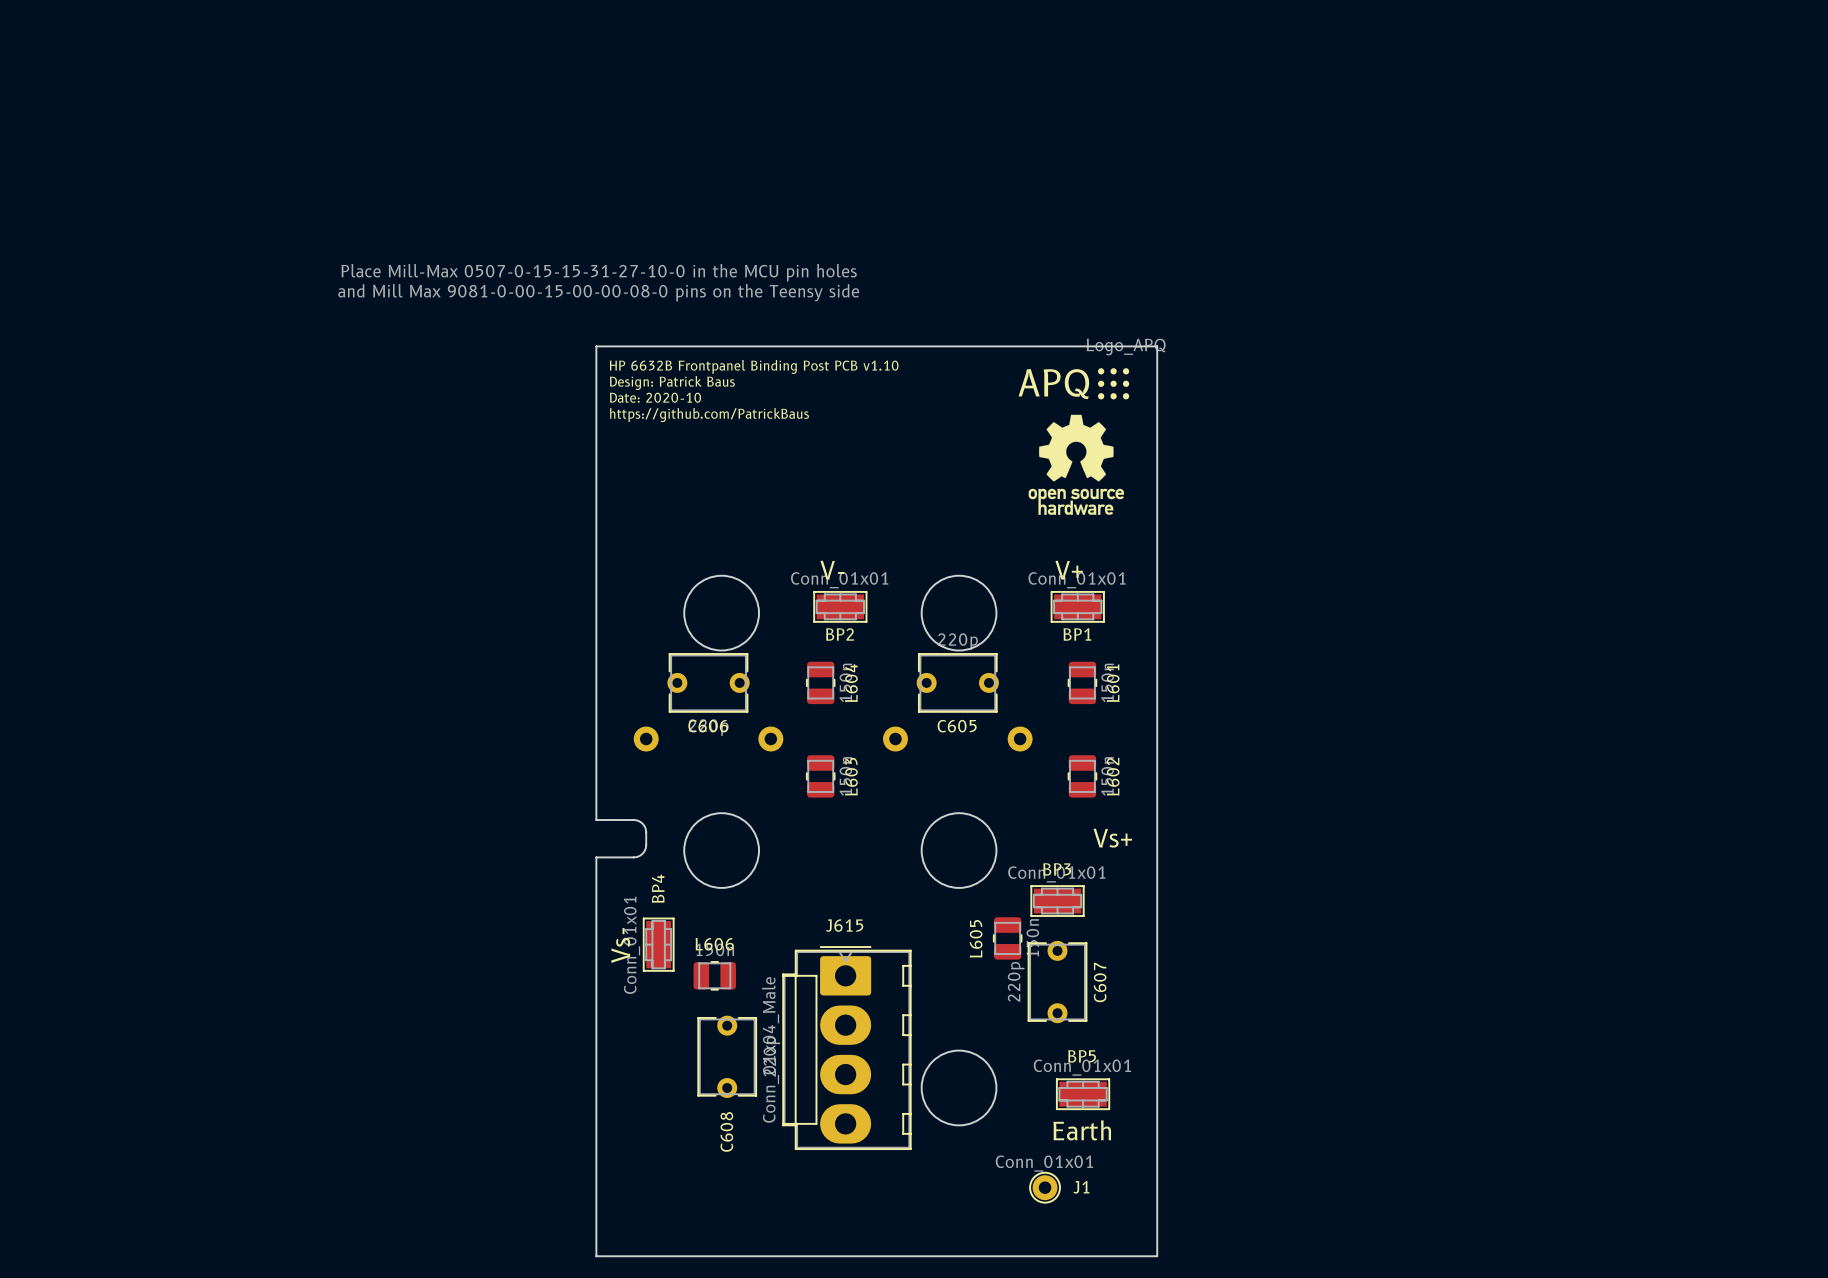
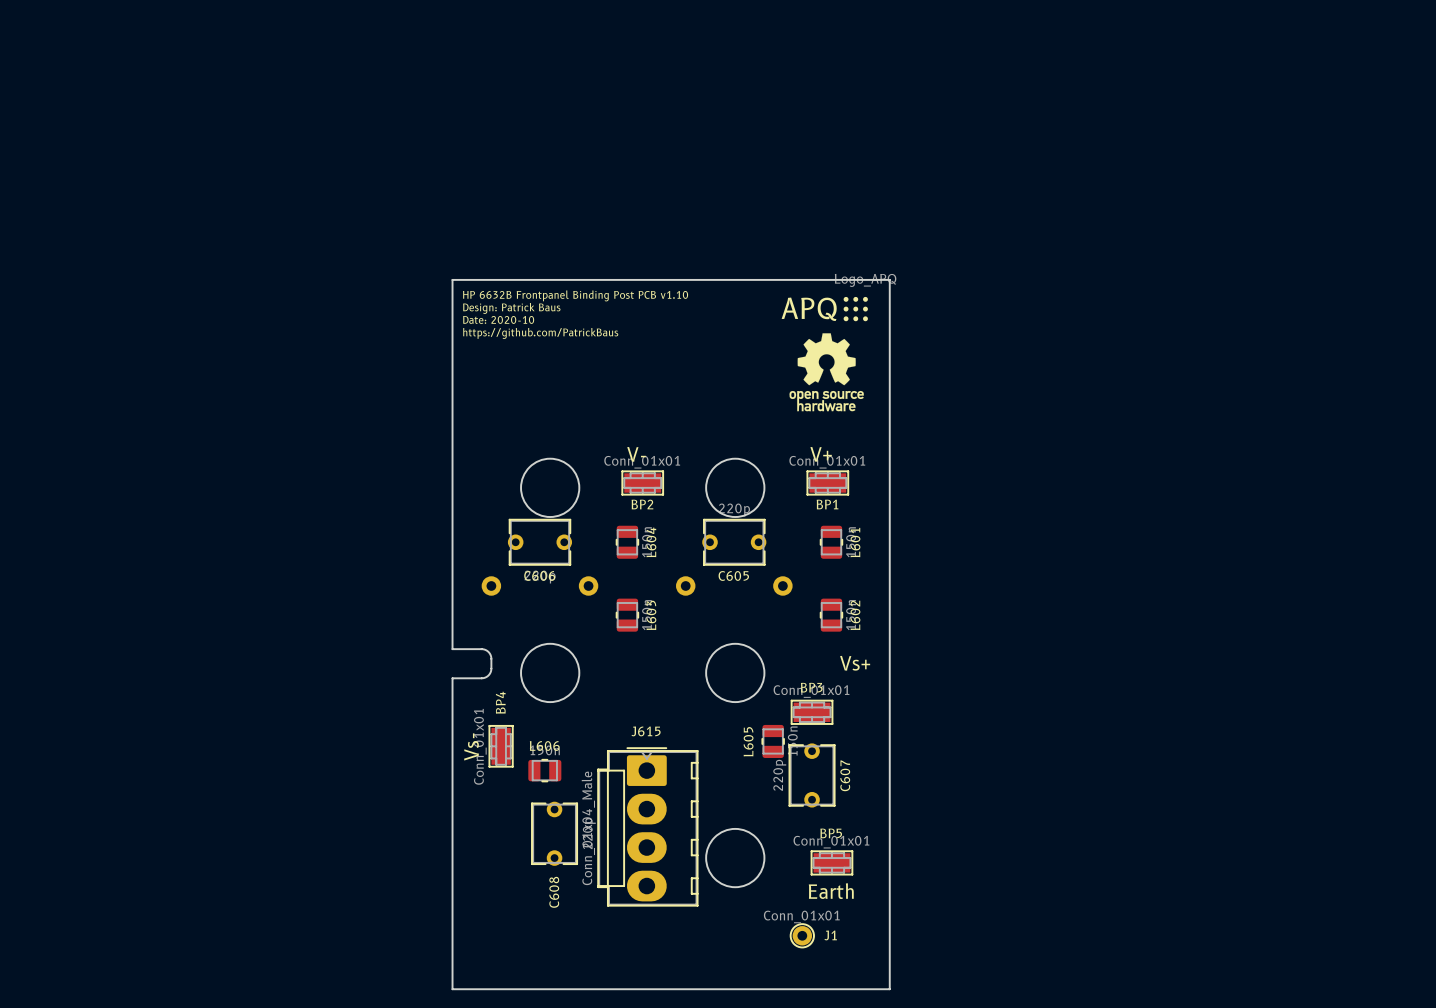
text: Place Mill-Max 0507-0-15-15-31-27-10-0 in the MCU pin holes (599, 272) -> none
text: and Mill Max 9081-0-00-15-00-00-08-0 pins on the Teensy side (598, 292) -> none

